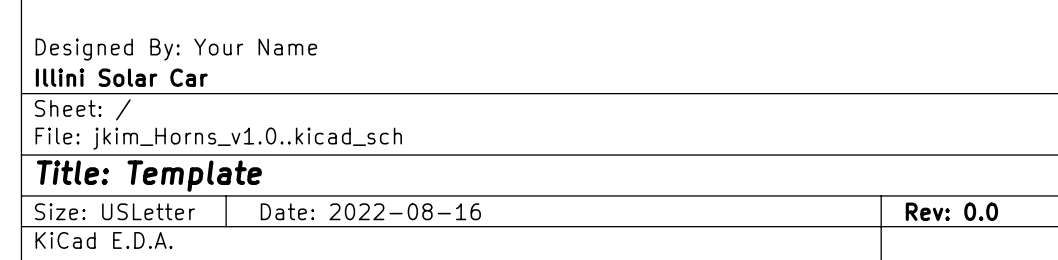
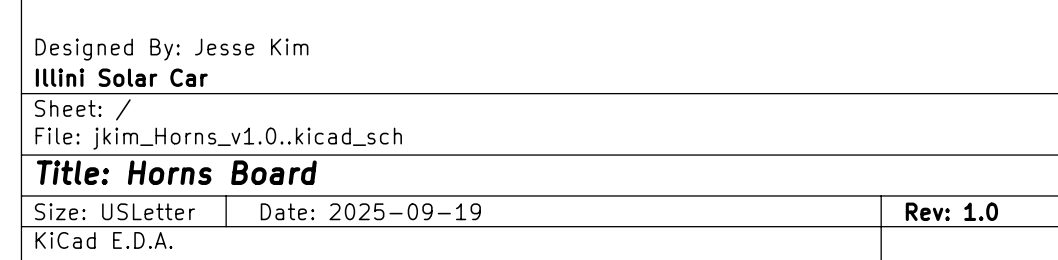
title block: Designed By: Your Name (176, 49) -> Designed By: Jesse Kim (171, 49)
title block: Title: Template (149, 176) -> Title: Horns Board (176, 172)
title block: Date: 2022-08-16 (370, 211) -> Date: 2025-09-19 (370, 211)
title block: Rev: 0.0 (951, 211) -> Rev: 1.0 (951, 211)

